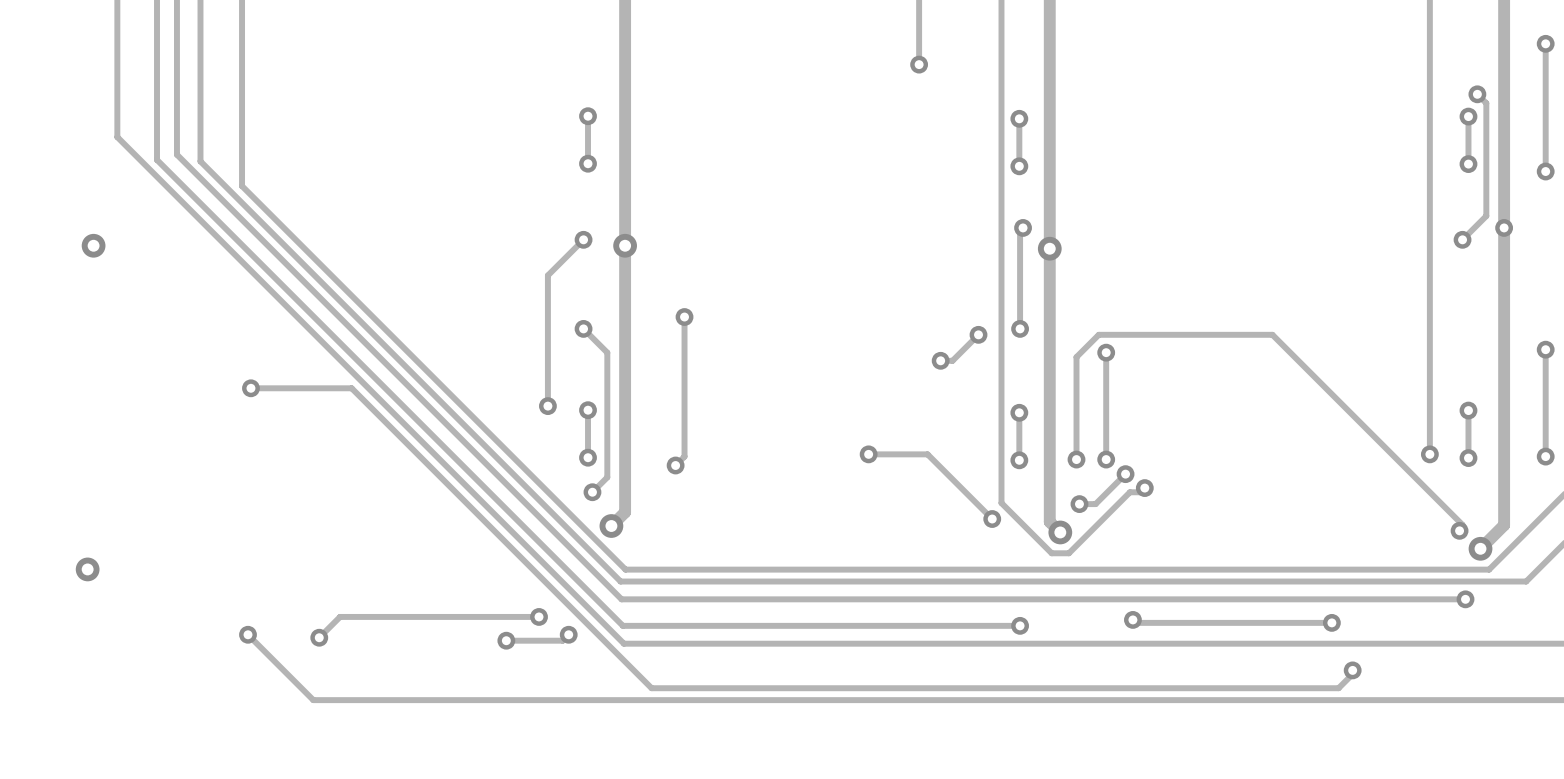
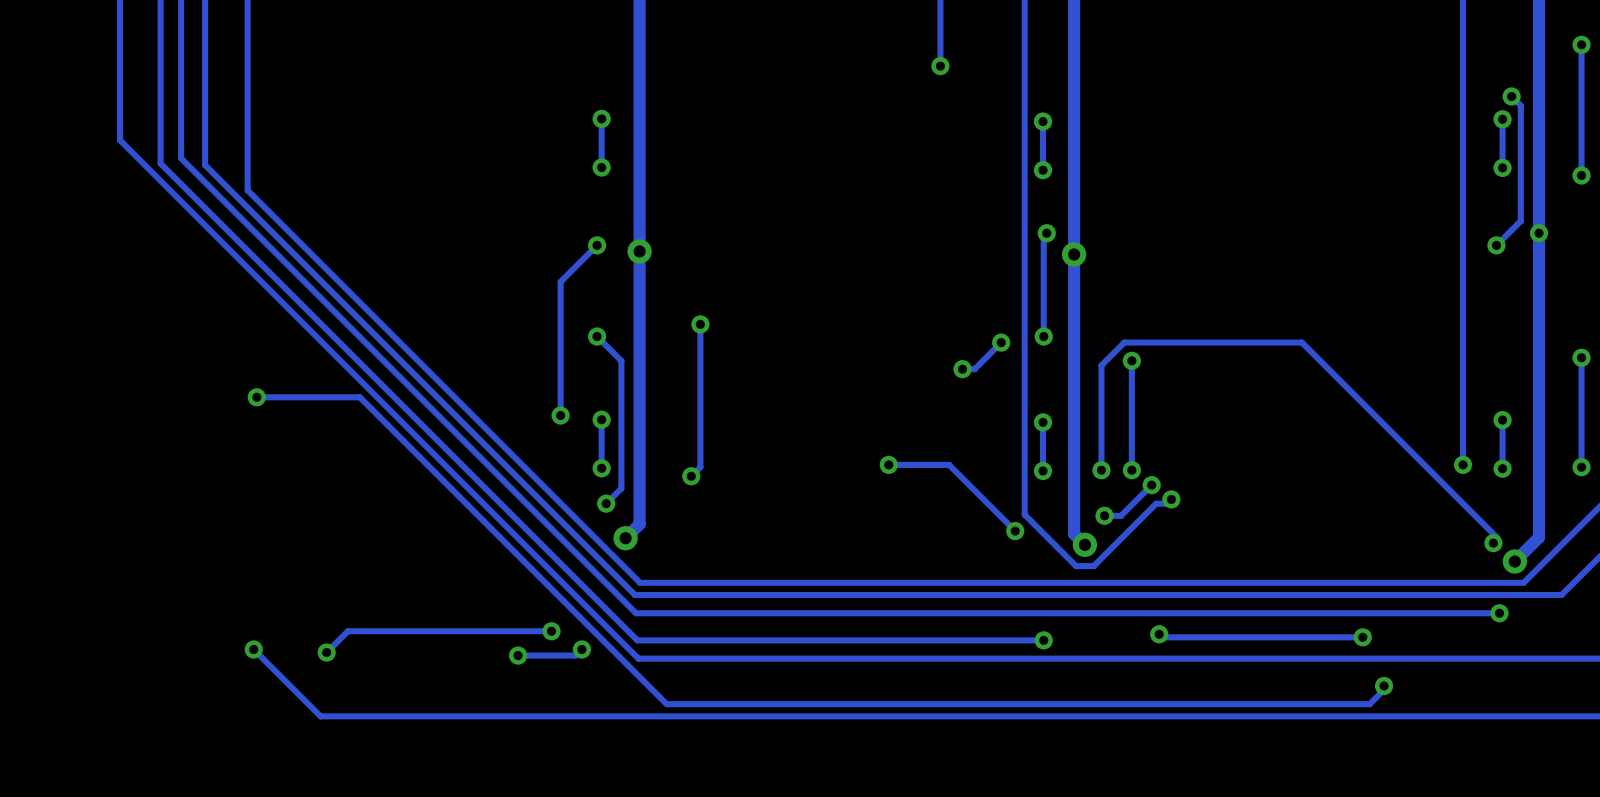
via: (93, 245) -> none
via: (87, 569) -> none

